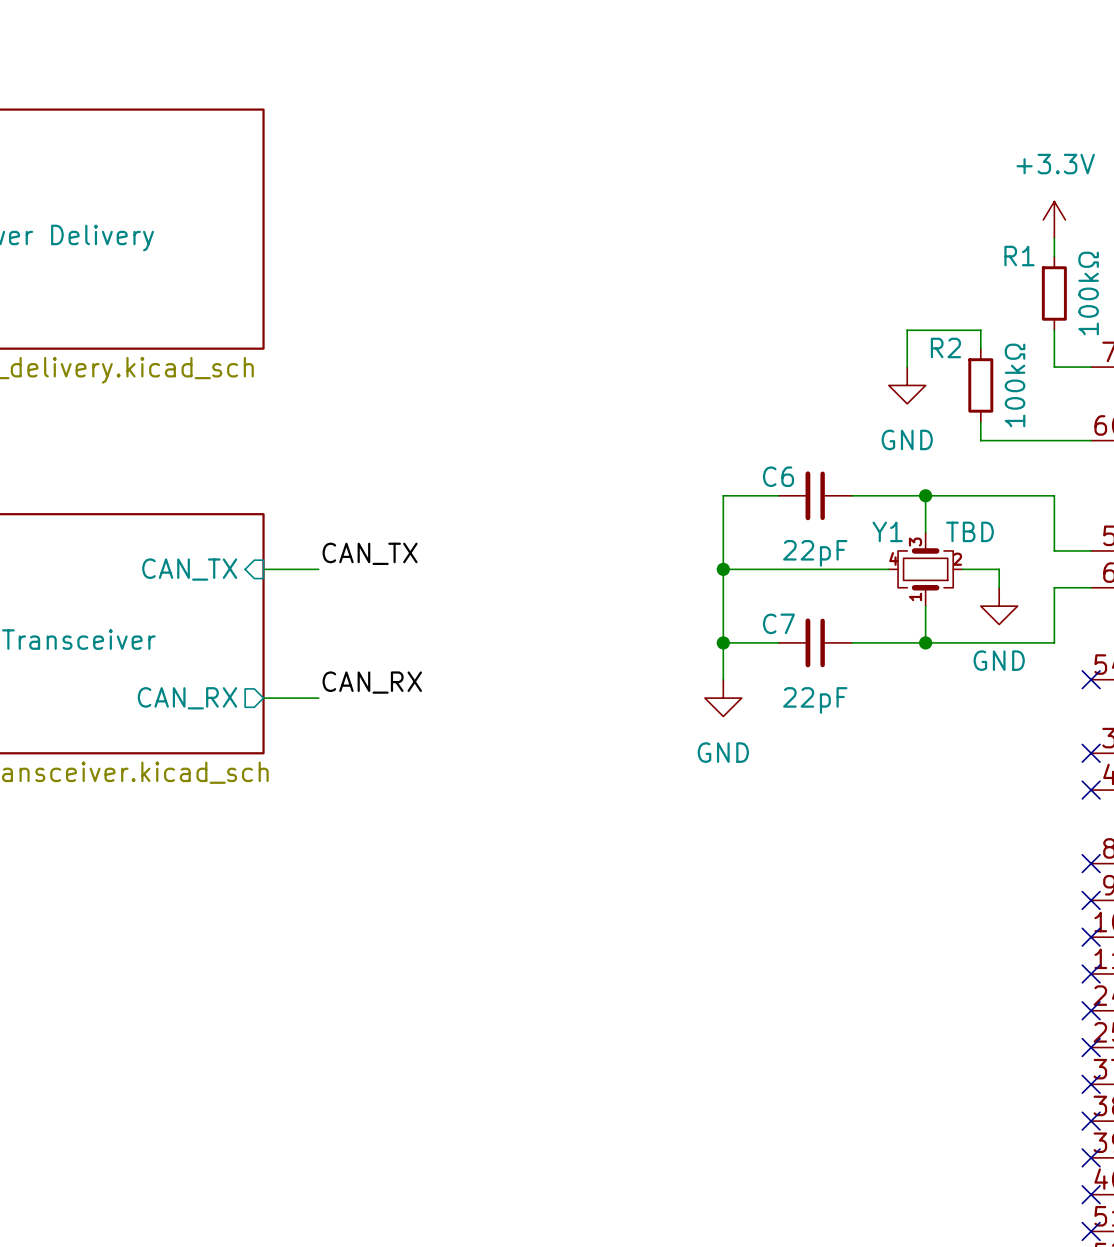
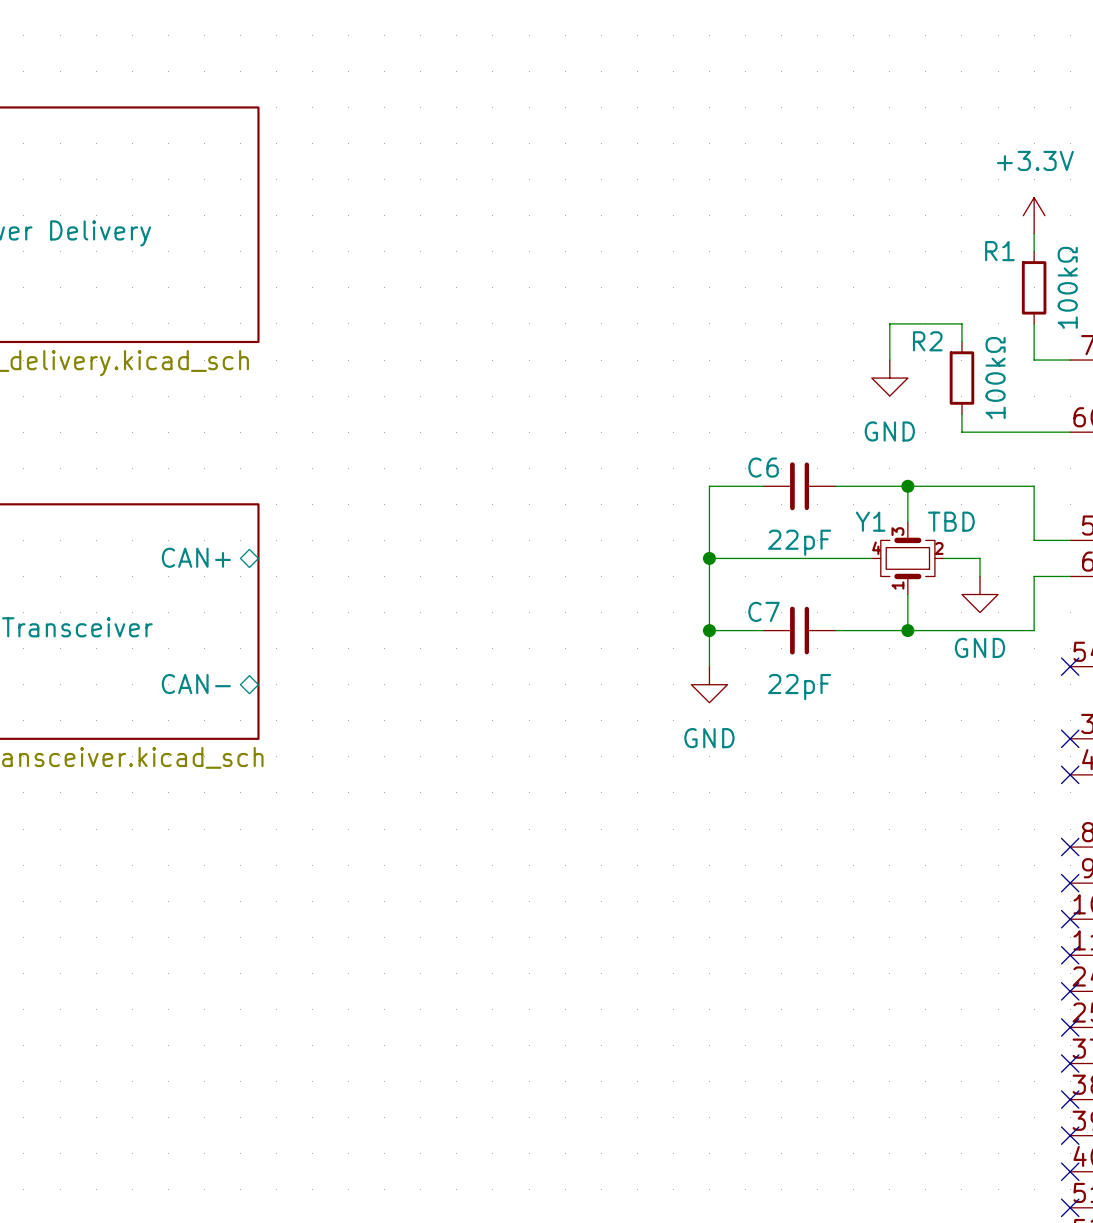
label: CAN_TX (370, 553) -> none
sheet pin shape: input (189, 569) -> bidirectional (196, 557)
sheet pin: CAN_TX (189, 569) -> CAN+ (196, 557)
wire: (263, 569) (318, 569) -> none
label: CAN_RX (372, 682) -> none
sheet pin shape: output (187, 698) -> bidirectional (196, 684)
sheet pin: CAN_RX (187, 698) -> CAN- (196, 684)
wire: (263, 698) (318, 698) -> none

